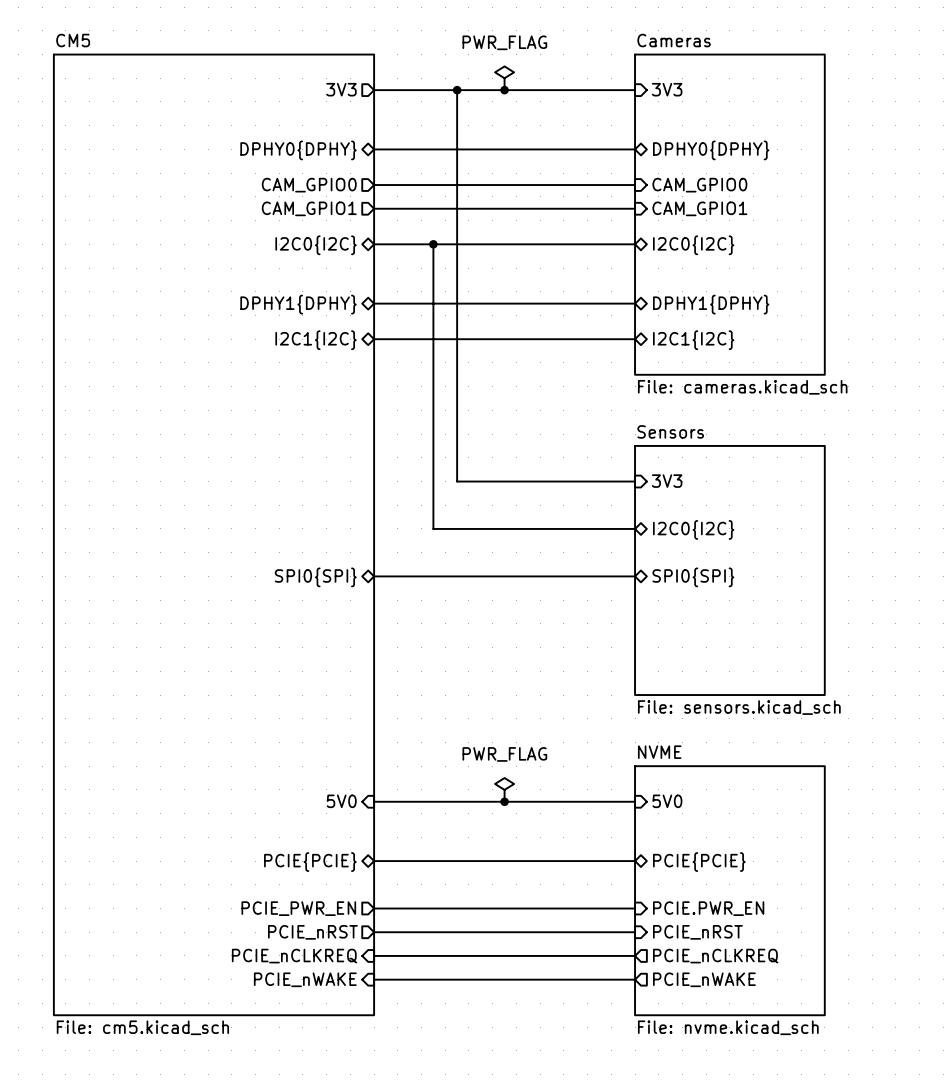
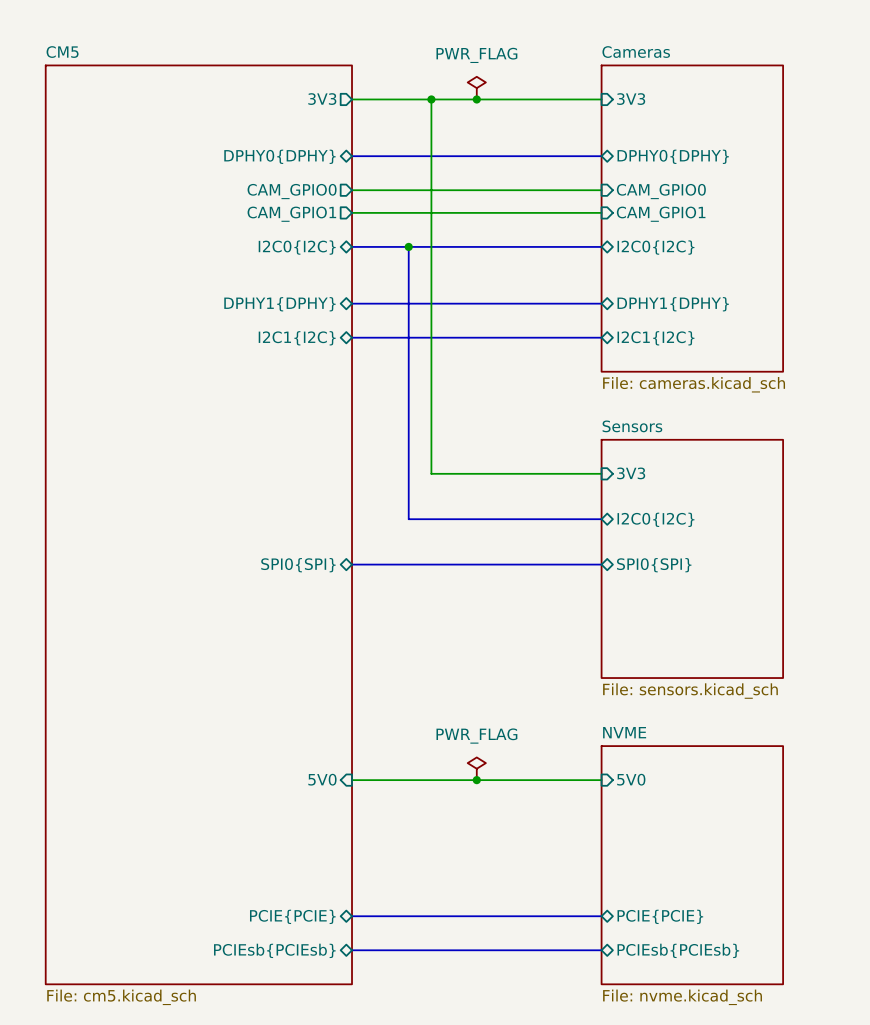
bus: (374, 861) (635, 861) -> (352, 916) (601, 916)
sheet pin position: PCIE{PCIE} (310, 862) -> PCIE{PCIE} (292, 916)
sheet pin position: PCIE{PCIE} (699, 862) -> PCIE{PCIE} (660, 916)
sheet pin: PCIE_PWR_EN (298, 908) -> none
wire: (374, 908) (635, 908) -> none
sheet pin: PCIE.PWR_EN (708, 908) -> none
sheet pin: PCIE_nRST (312, 932) -> none
wire: (374, 932) (635, 932) -> none
sheet pin: PCIE_nRST (697, 932) -> none
wire: (374, 955) (635, 955) -> none
sheet pin: PCIE_nCLKREQ (294, 956) -> none
sheet pin: PCIE_nCLKREQ (715, 956) -> none
sheet pin shape: input (305, 979) -> bidirectional (274, 950)
sheet pin: PCIE_nWAKE (305, 979) -> PCIEsb{PCIEsb} (274, 950)
bus: none -> (352, 950) (601, 950)
sheet pin shape: output (704, 979) -> bidirectional (678, 950)
sheet pin: PCIE_nWAKE (704, 979) -> PCIEsb{PCIEsb} (678, 950)

